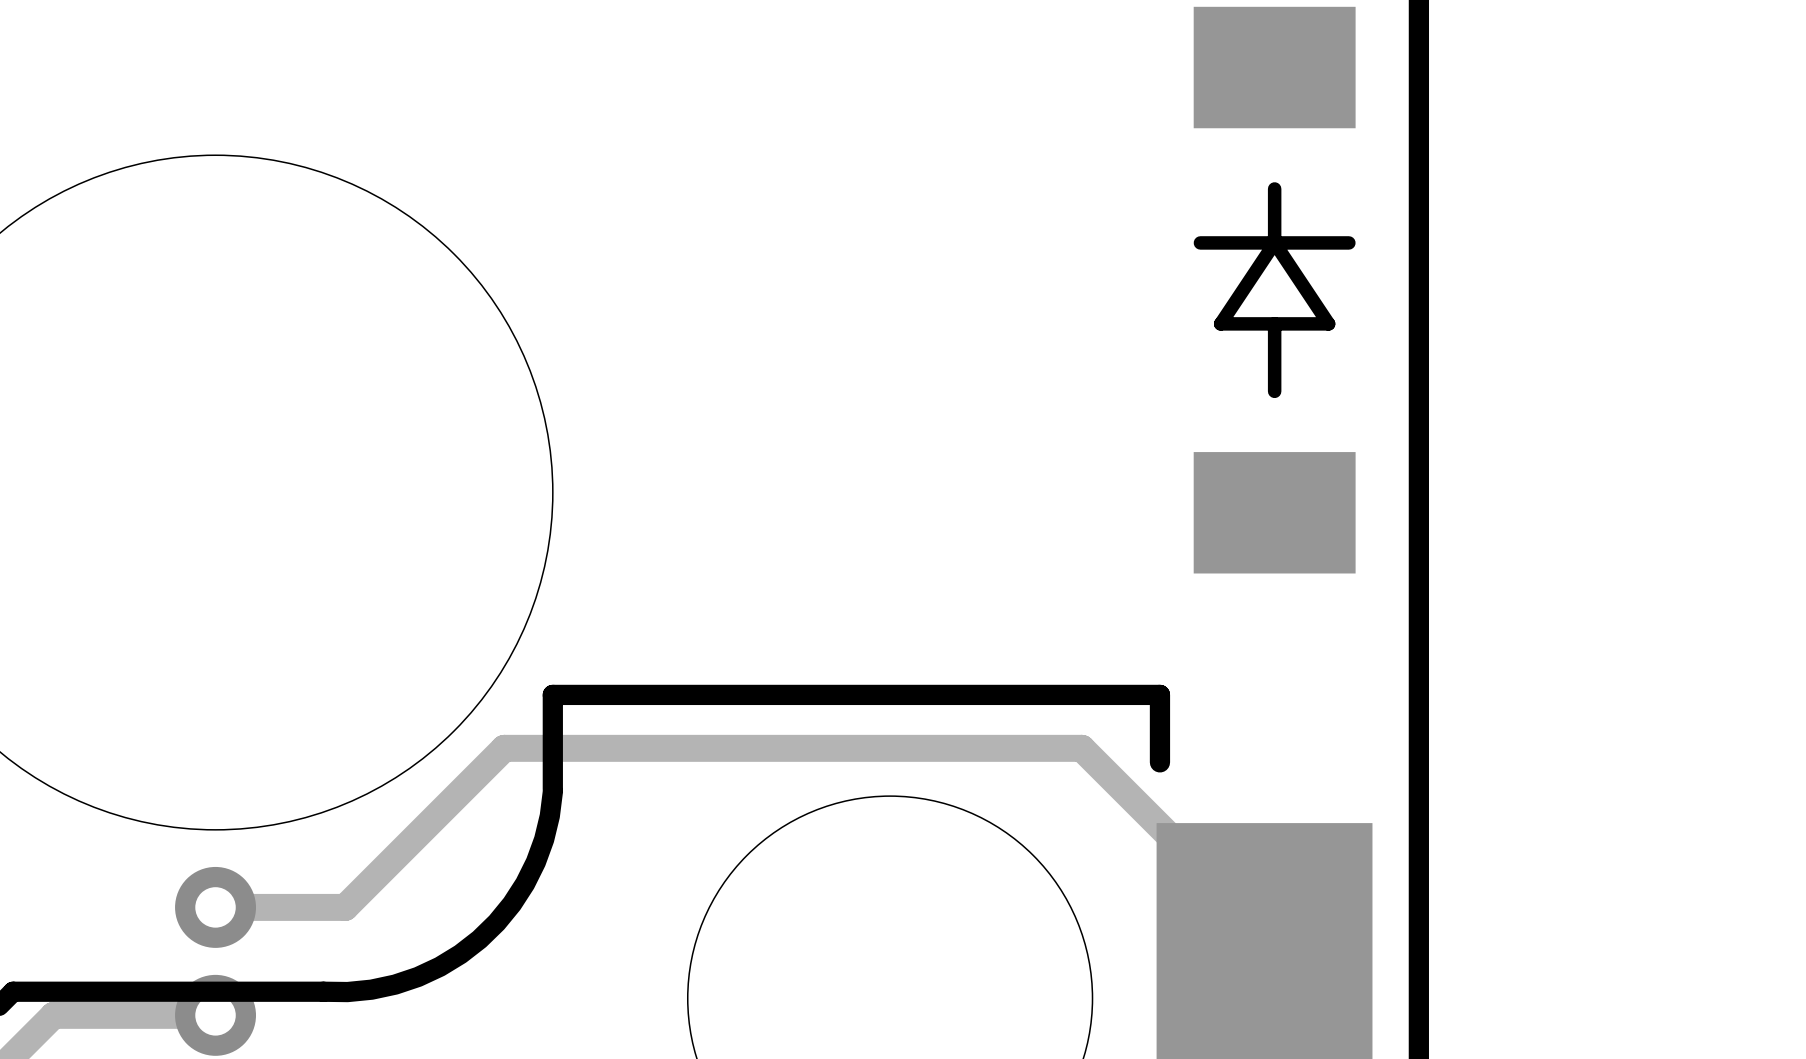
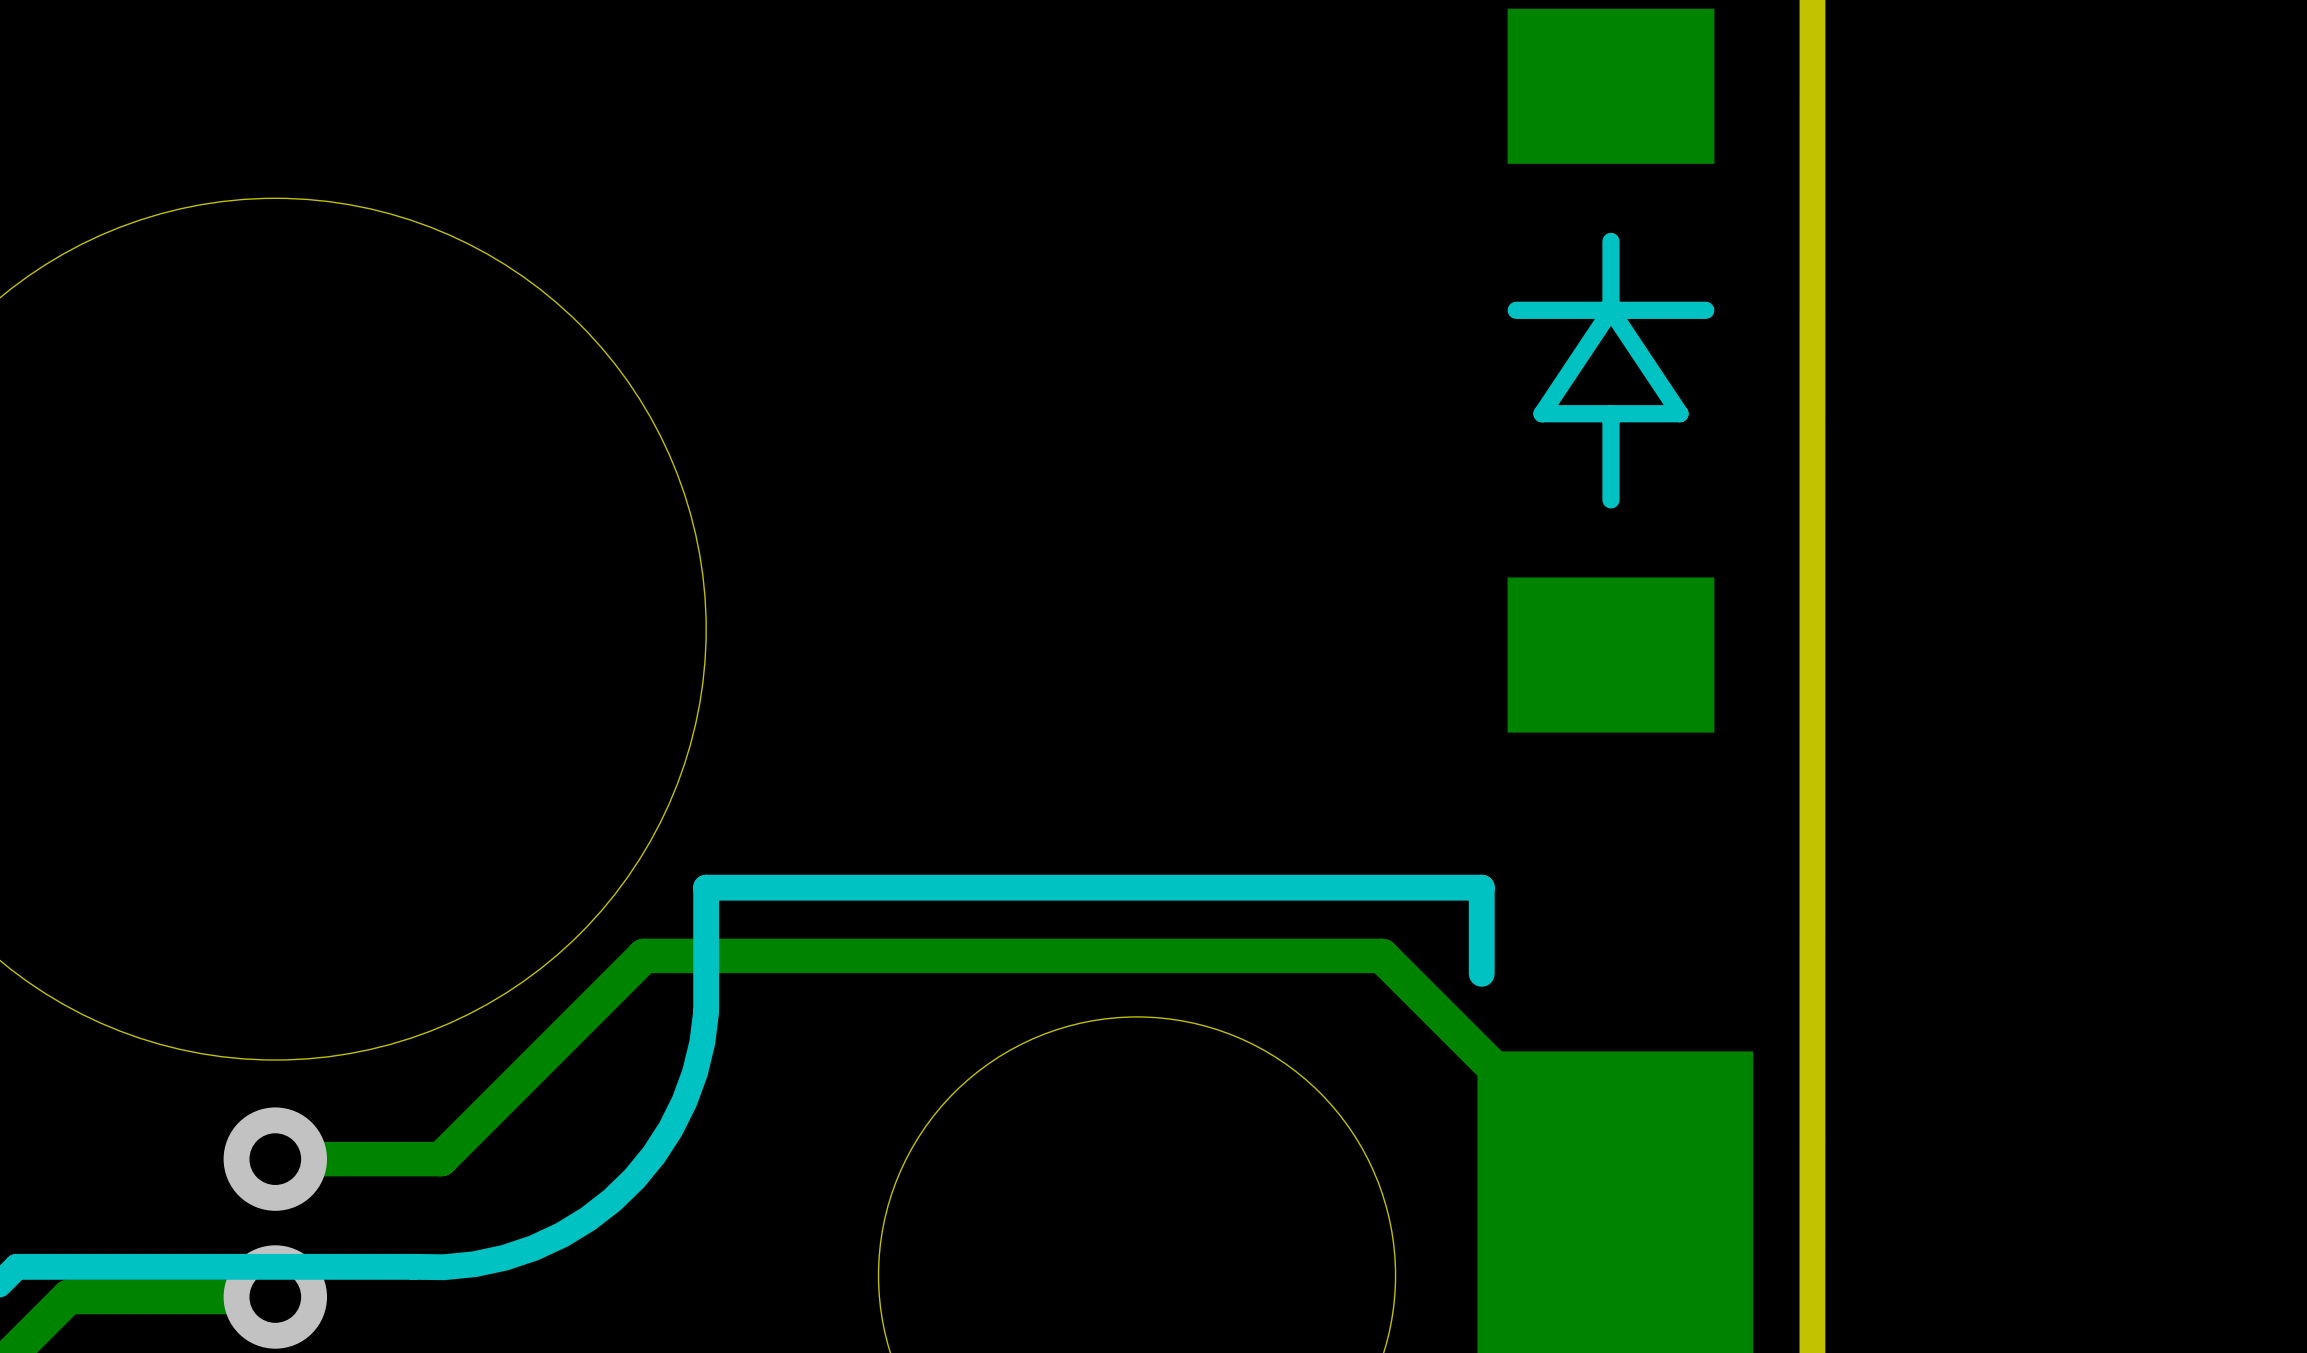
part position: (1274, 290) -> (1610, 370)

